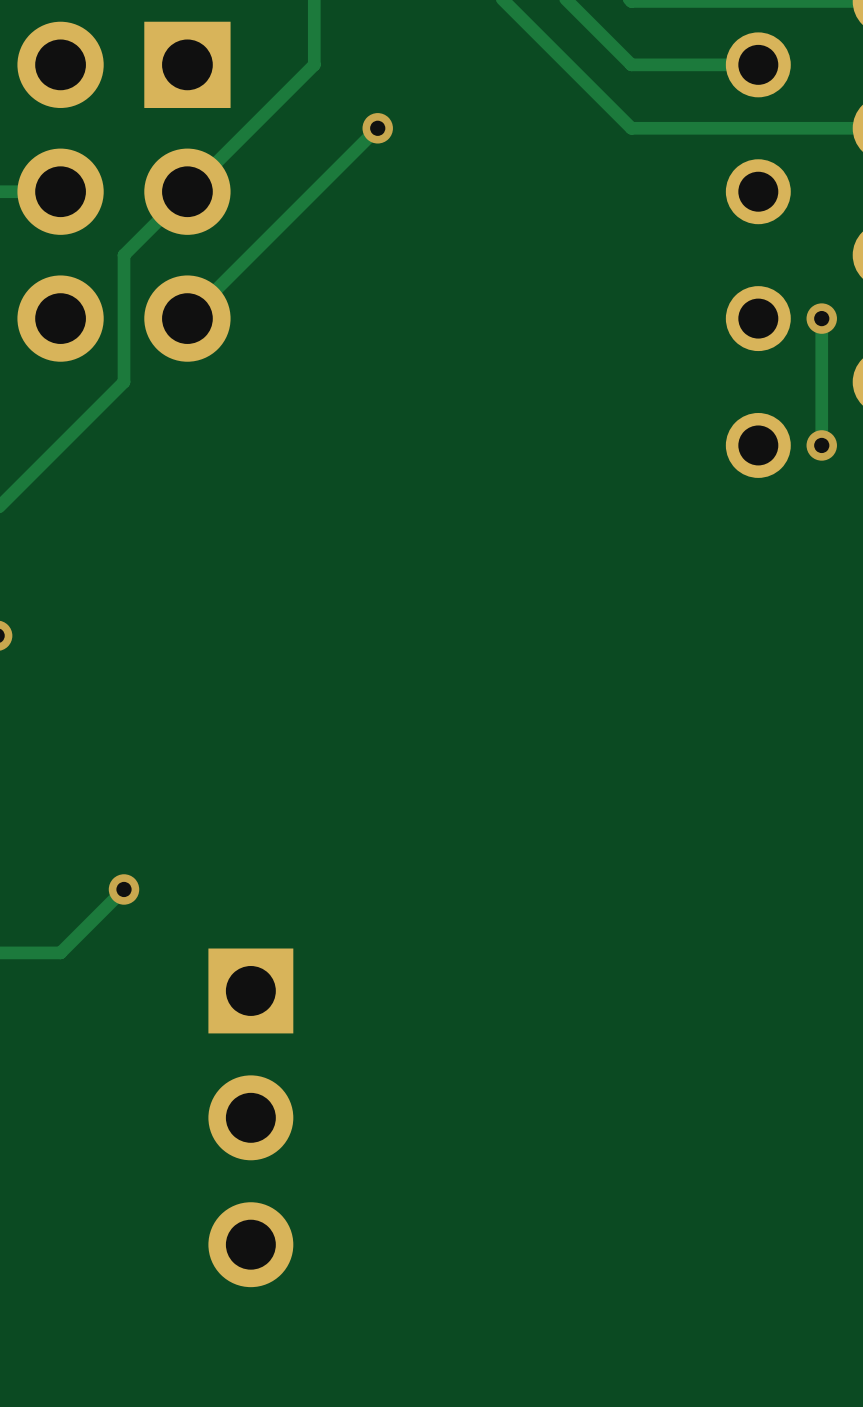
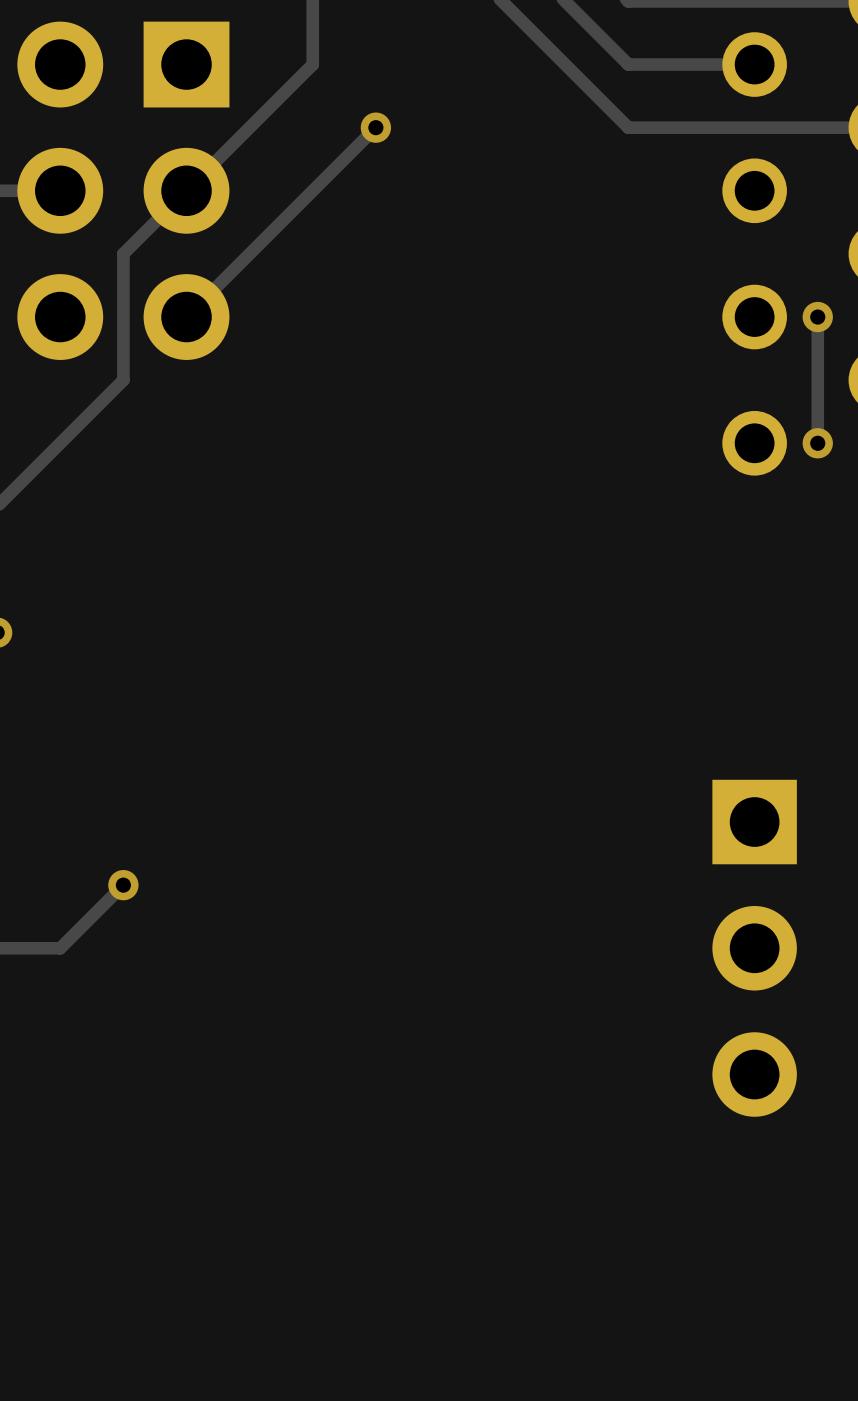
part position: (250, 1117) -> (754, 948)

